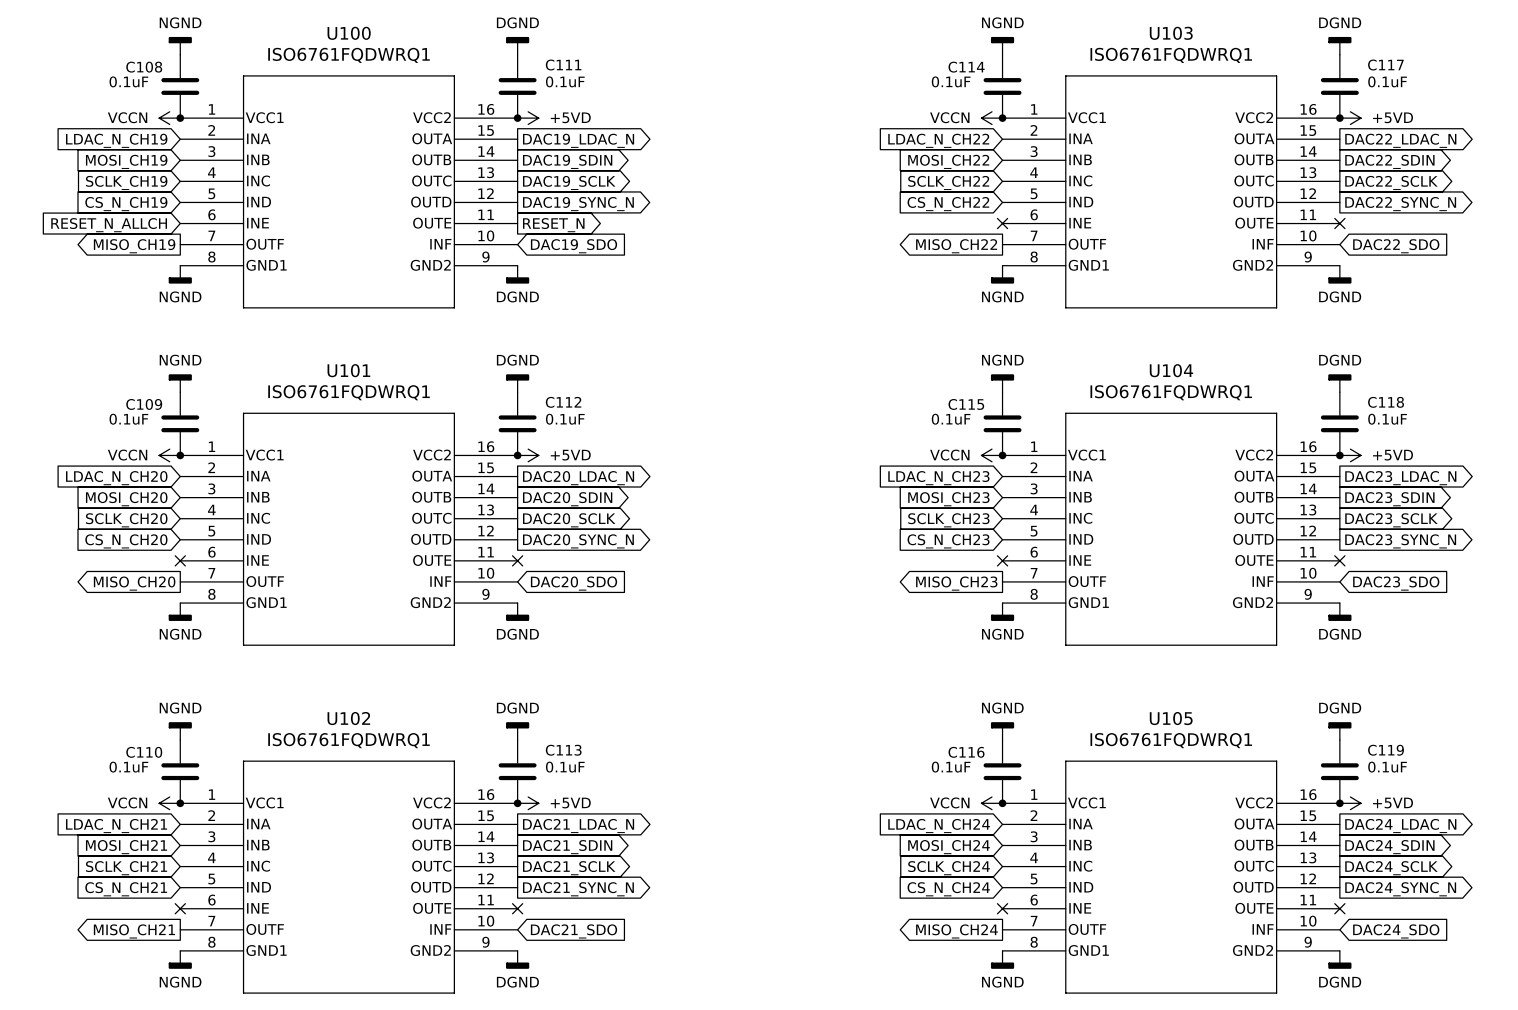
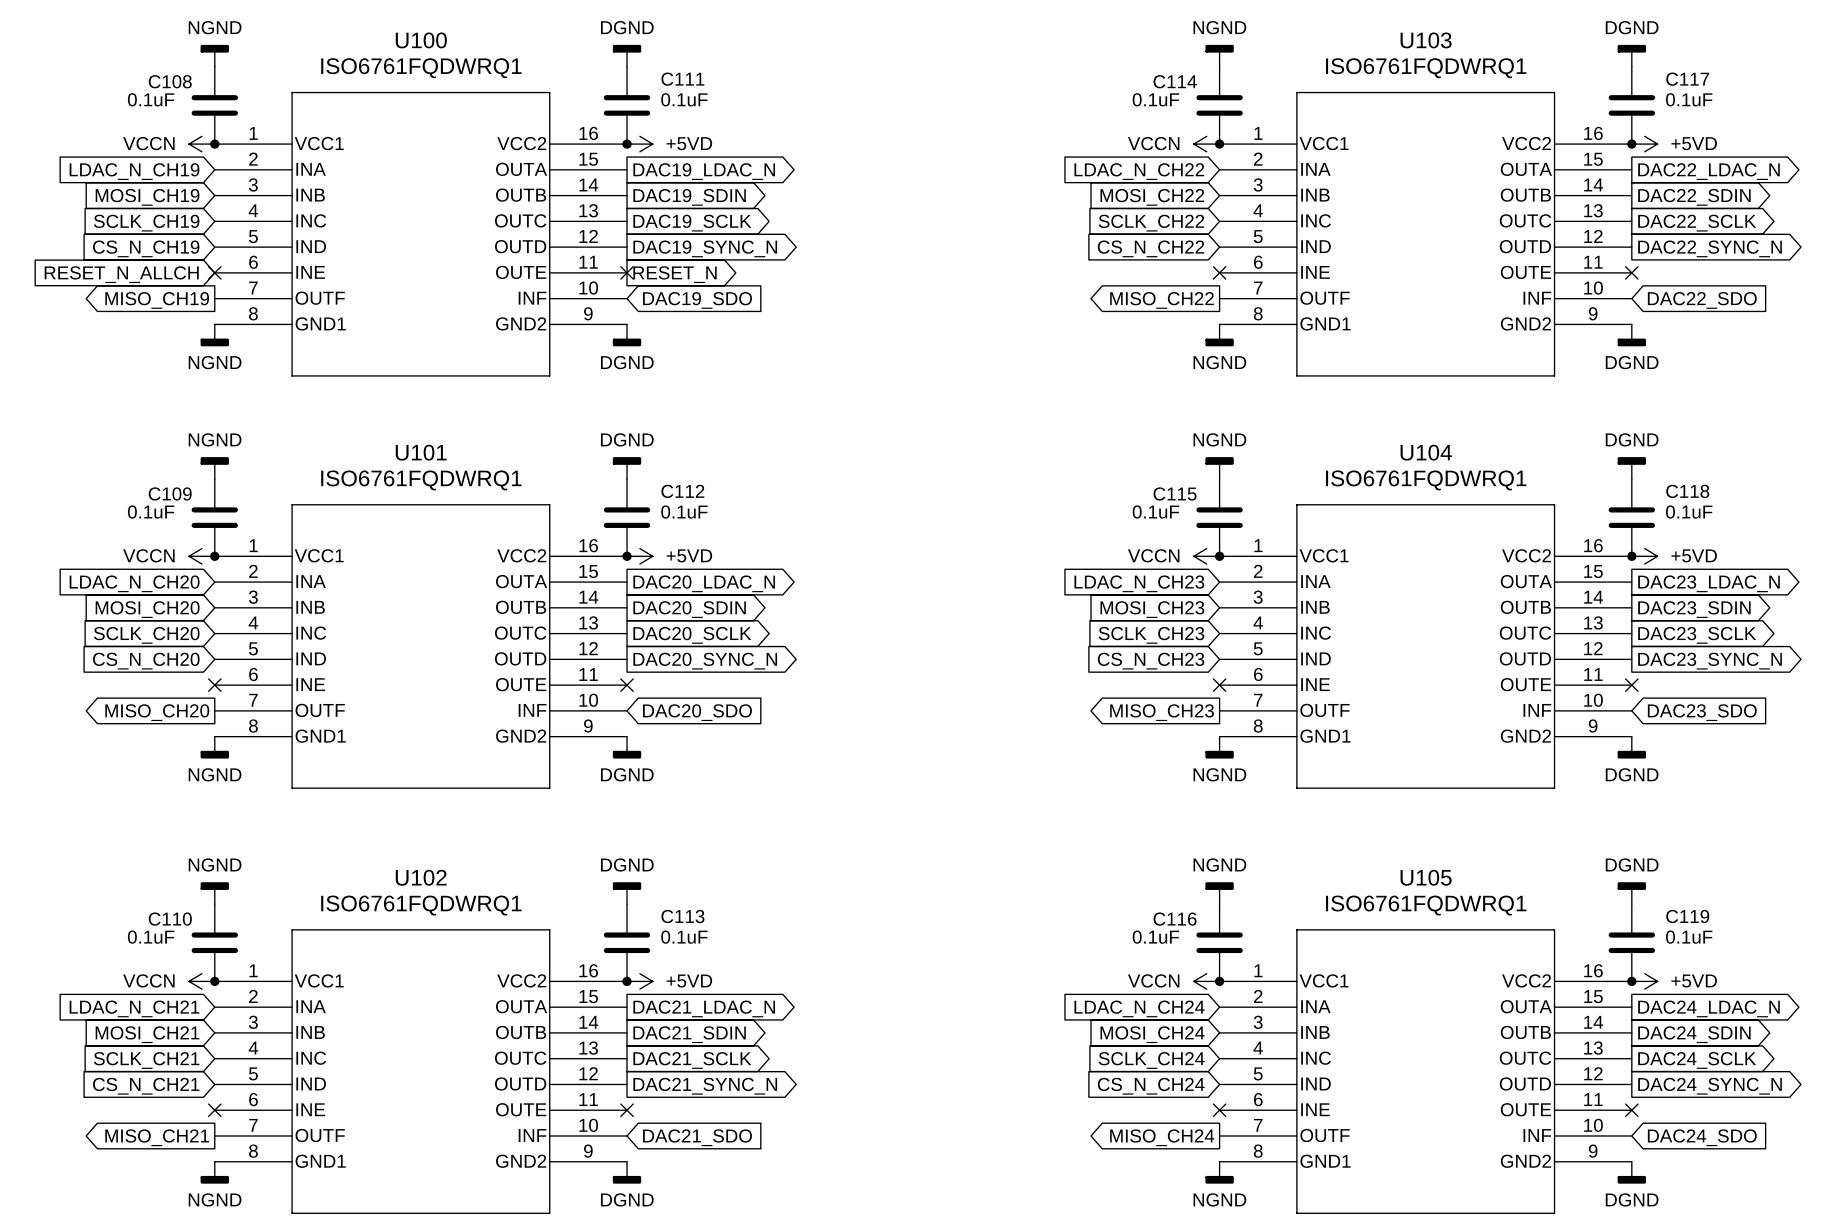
no-connect mark: none -> (214, 272)
no-connect mark: none -> (627, 272)

